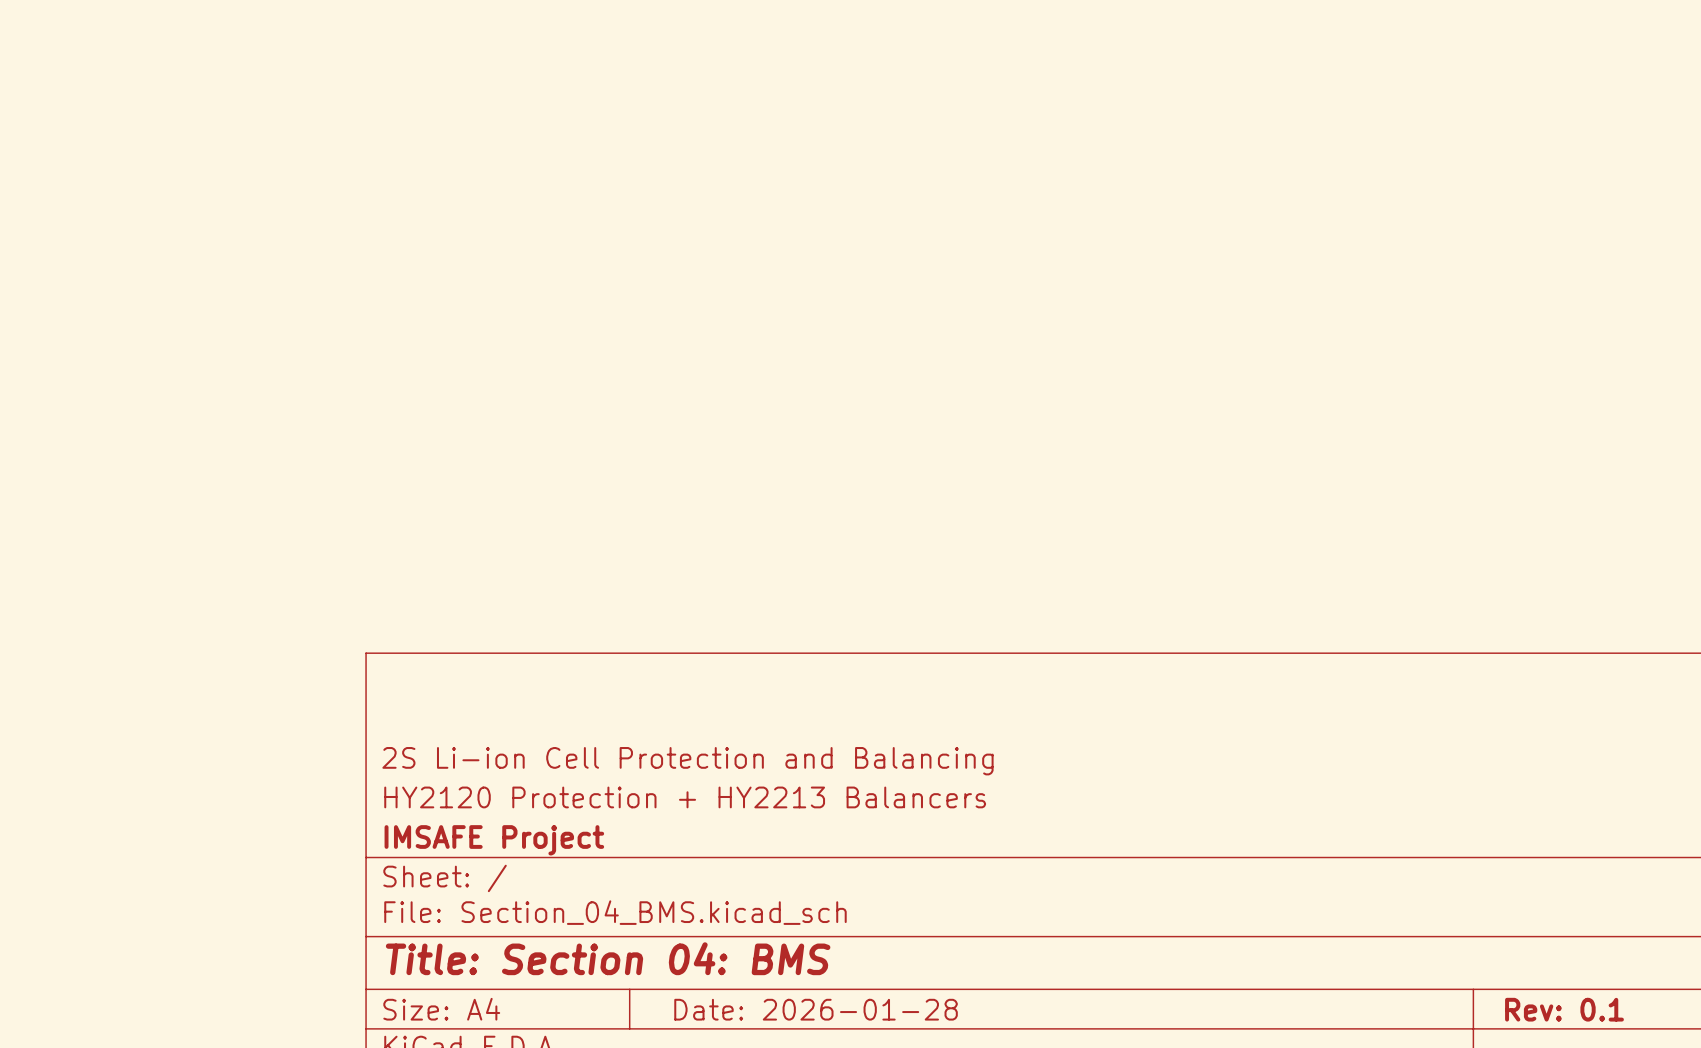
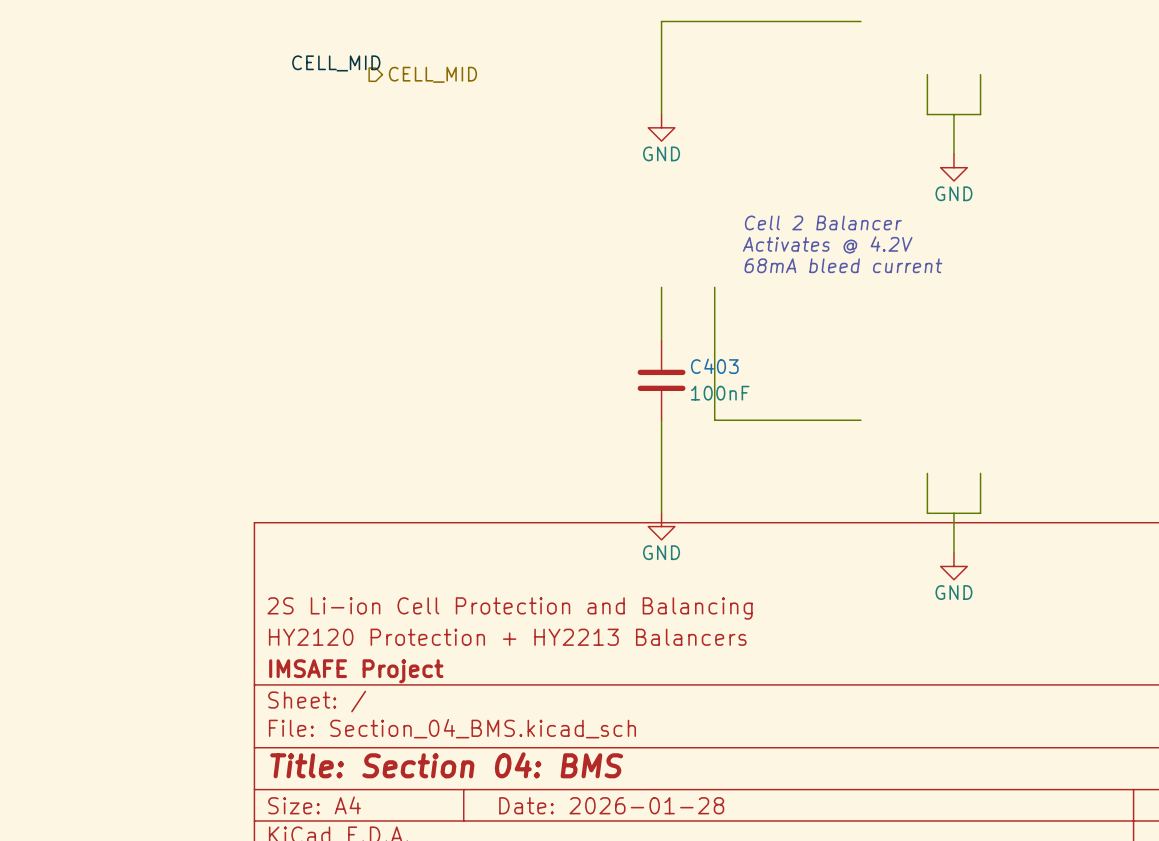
wire: none -> (860, 21) (661, 21) (661, 114)
label: none -> CELL_MID (336, 63)
wire: none -> (927, 74) (927, 114) (980, 114) (980, 74)
hierarchical label: none -> CELL_MID (432, 74)
wire: none -> (953, 114) (953, 154)
power symbol: none -> GND (661, 127)
power symbol: none -> GND (953, 167)
text: none -> Cell 2 Balancer (823, 222)
text: none -> Activates @ 4.2V (827, 244)
text: none -> 68mA bleed current (843, 265)
wire: none -> (661, 287) (661, 340)
wire: none -> (714, 287) (714, 420) (860, 420)
C403: none -> 100nF (661, 380)
wire: none -> (661, 420) (661, 513)
wire: none -> (927, 473) (927, 513) (980, 513) (980, 473)
wire: none -> (953, 513) (953, 553)
power symbol: none -> GND (661, 526)
power symbol: none -> GND (953, 566)

